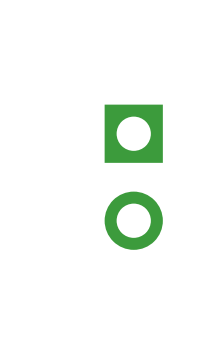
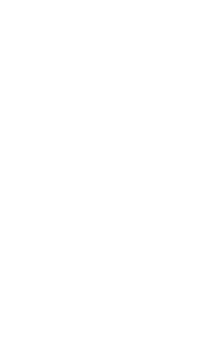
part: (133, 177) -> none

